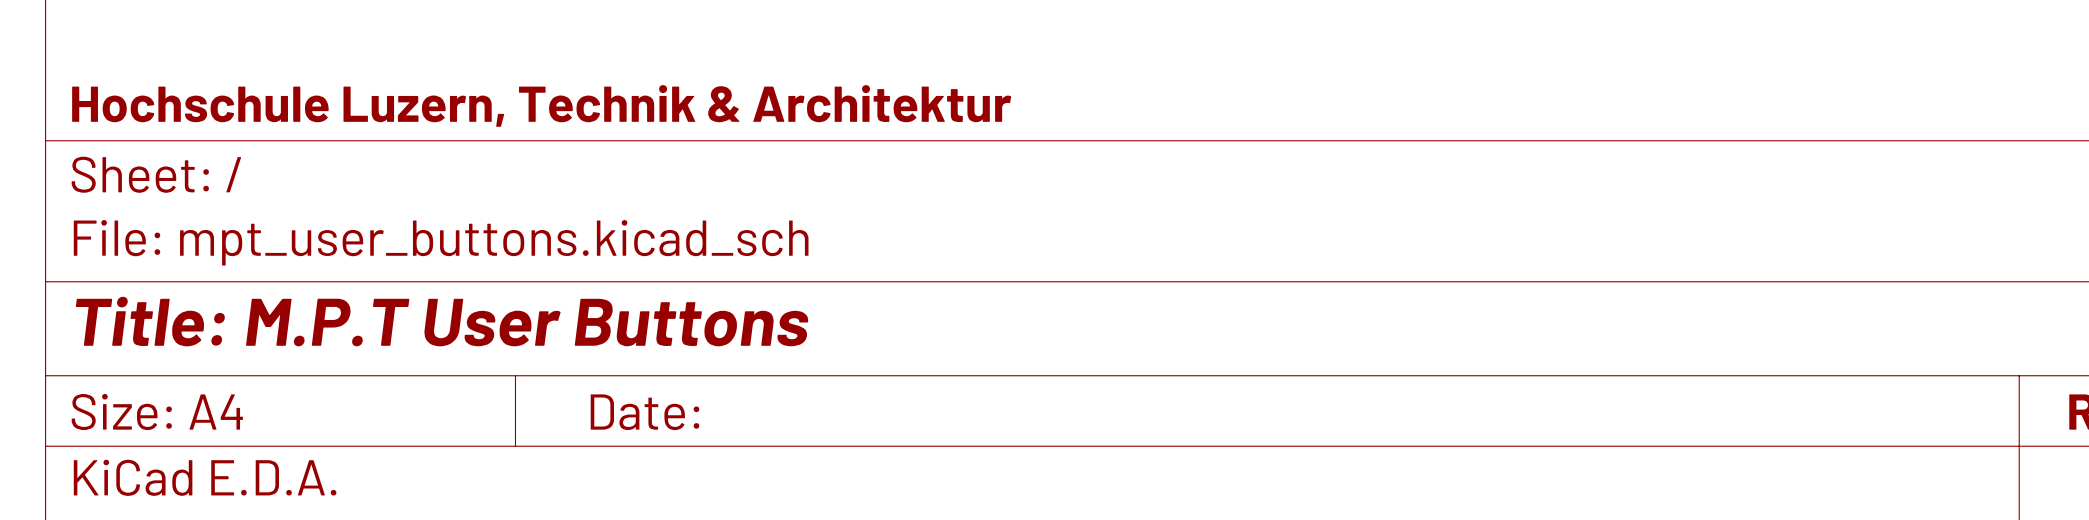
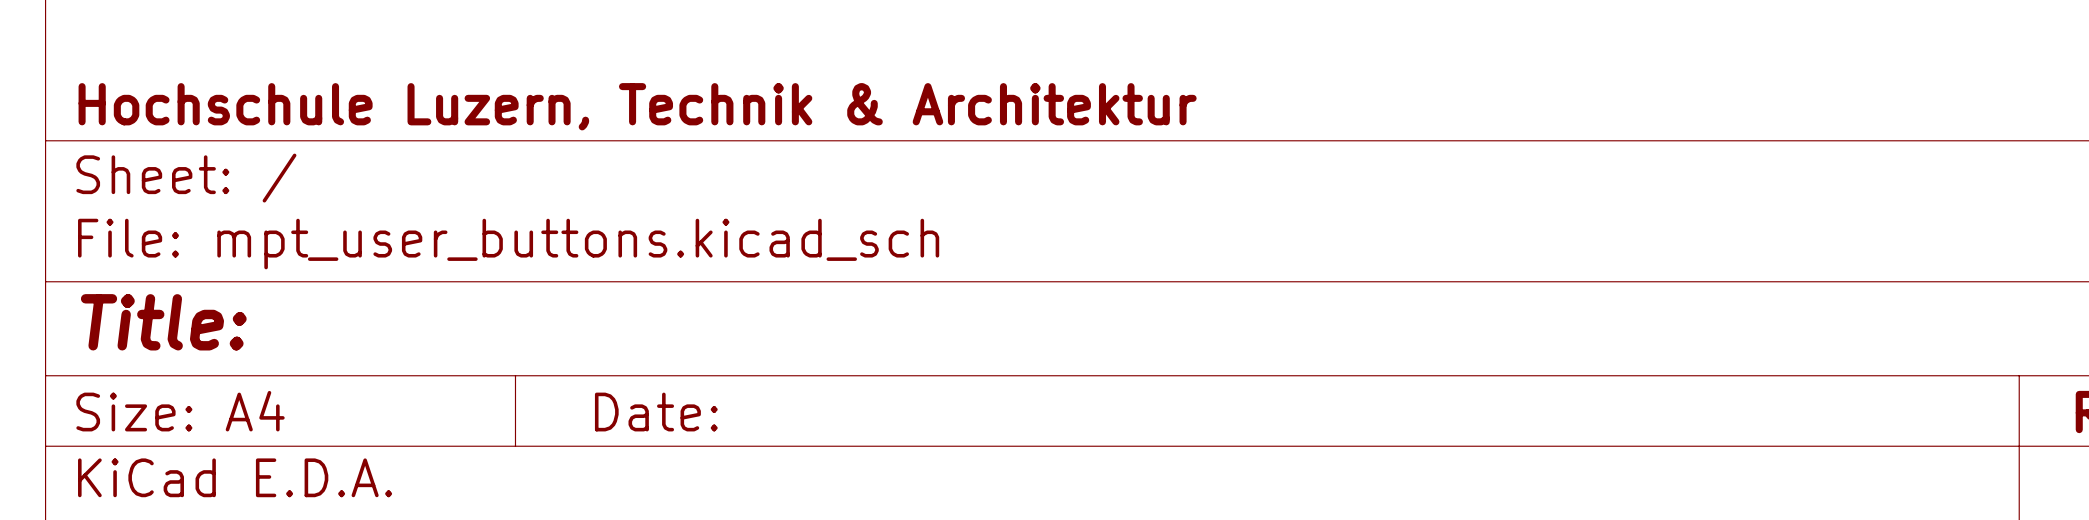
title block: Title: M.P.T User Buttons (442, 321) -> Title: (163, 322)

